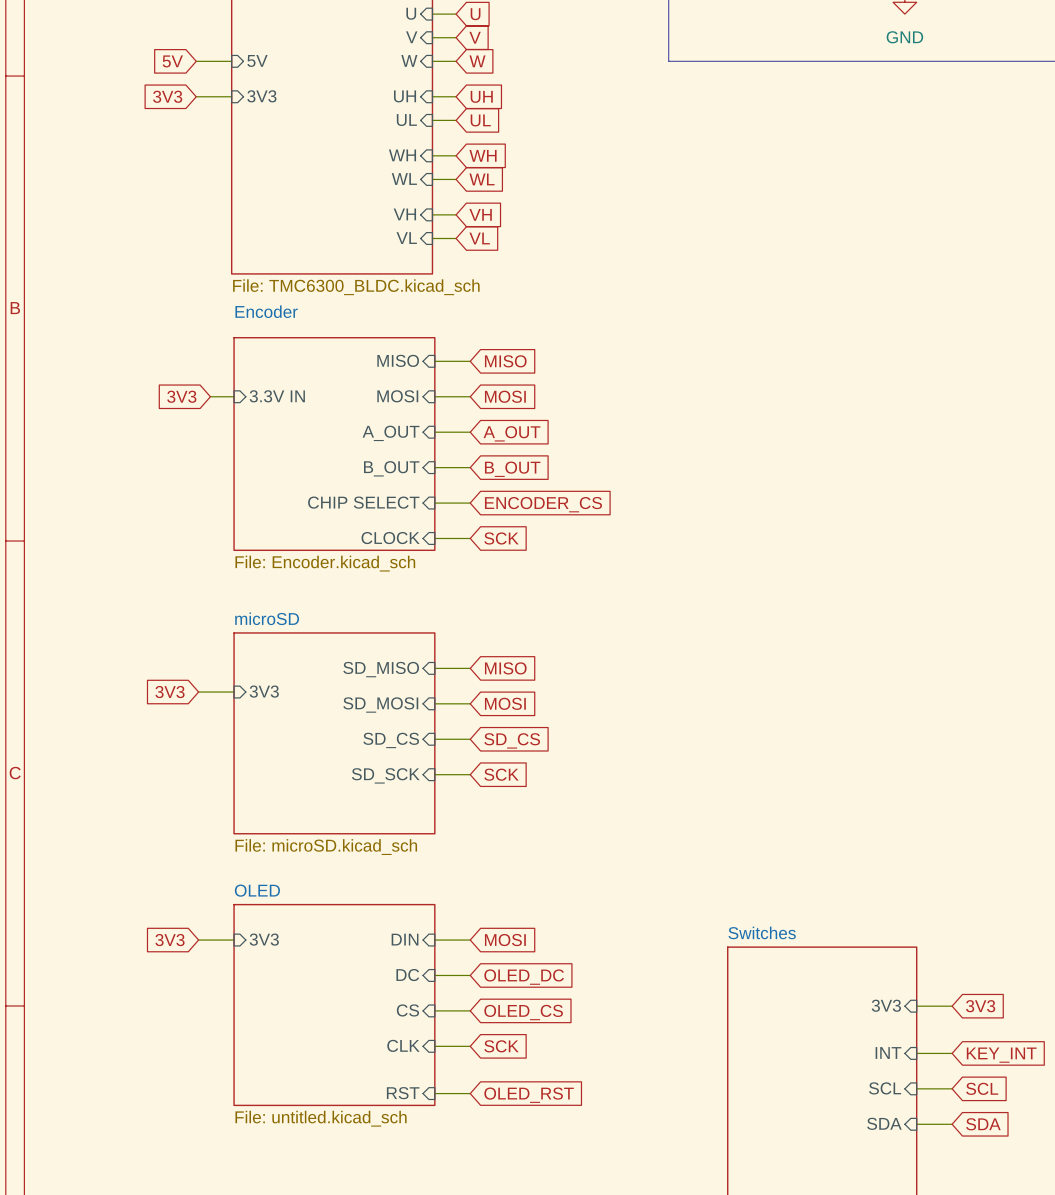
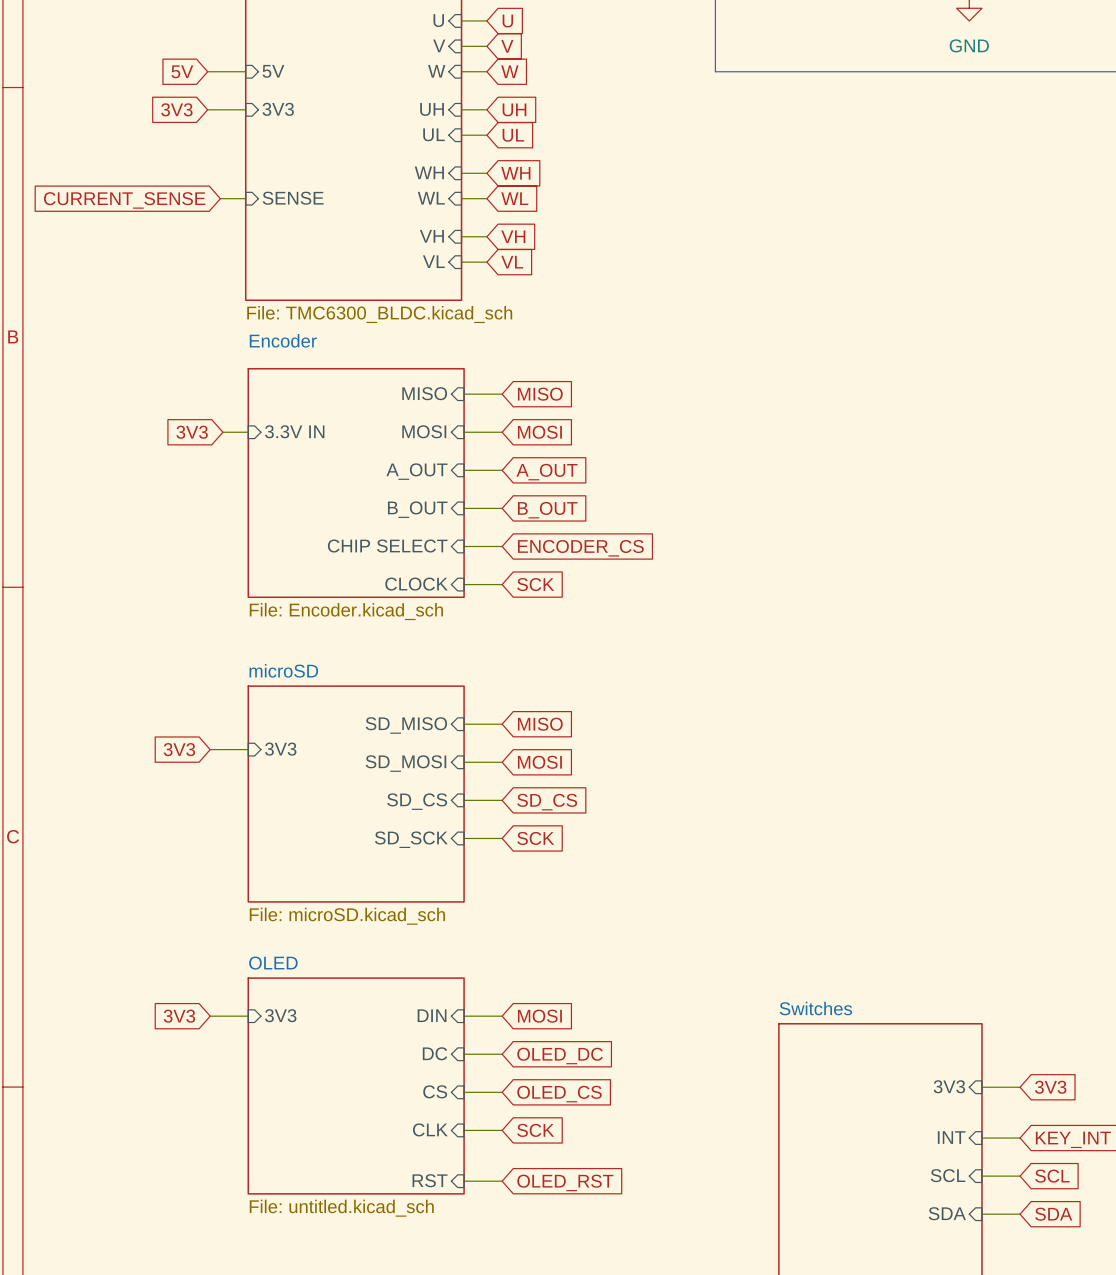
wire: none -> (220, 198) (245, 198)
sheet pin: none -> SENSE (293, 198)
global label: none -> CURRENT_SENSE (124, 200)

